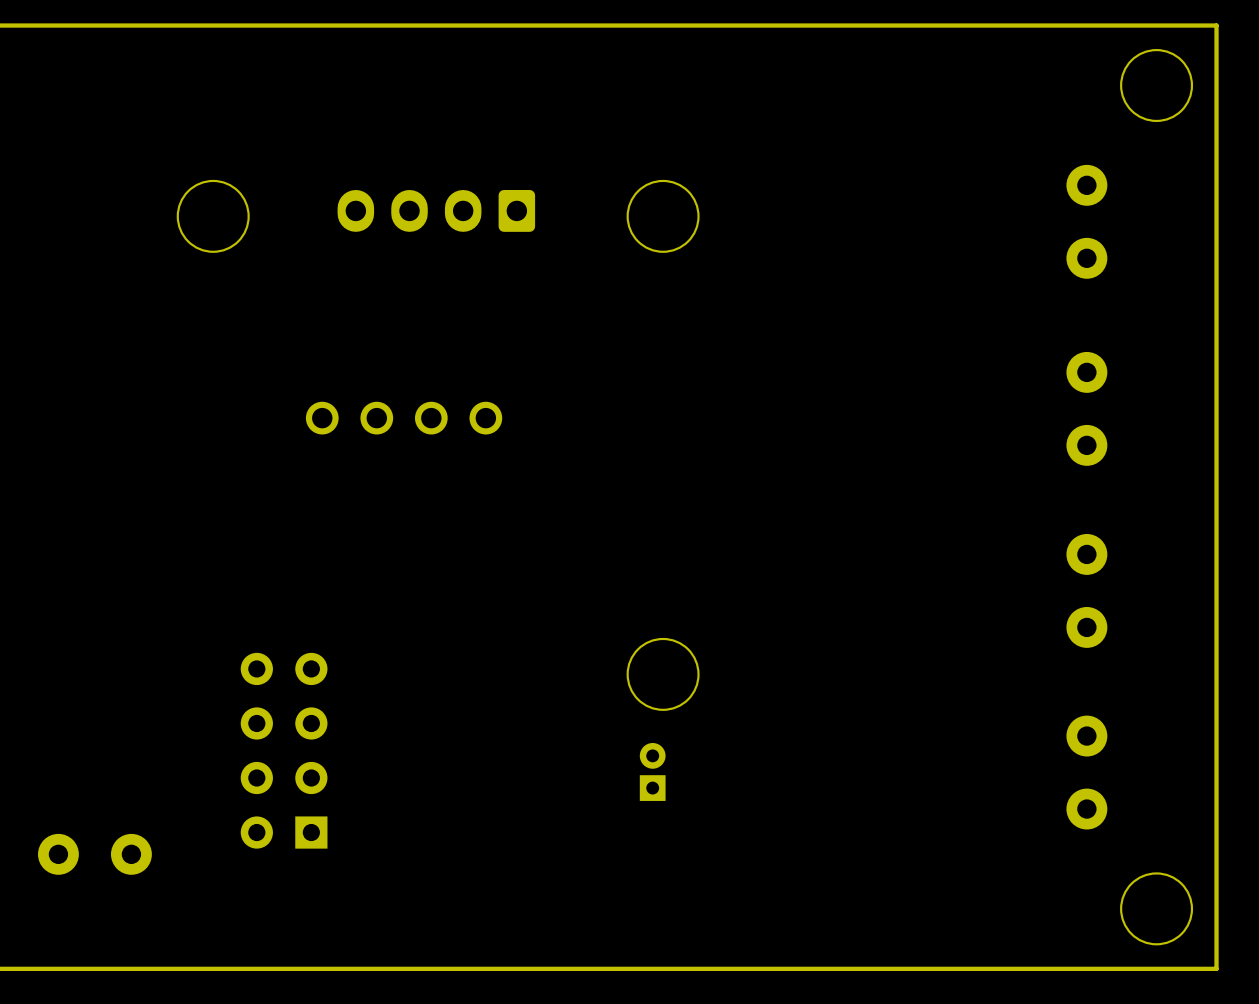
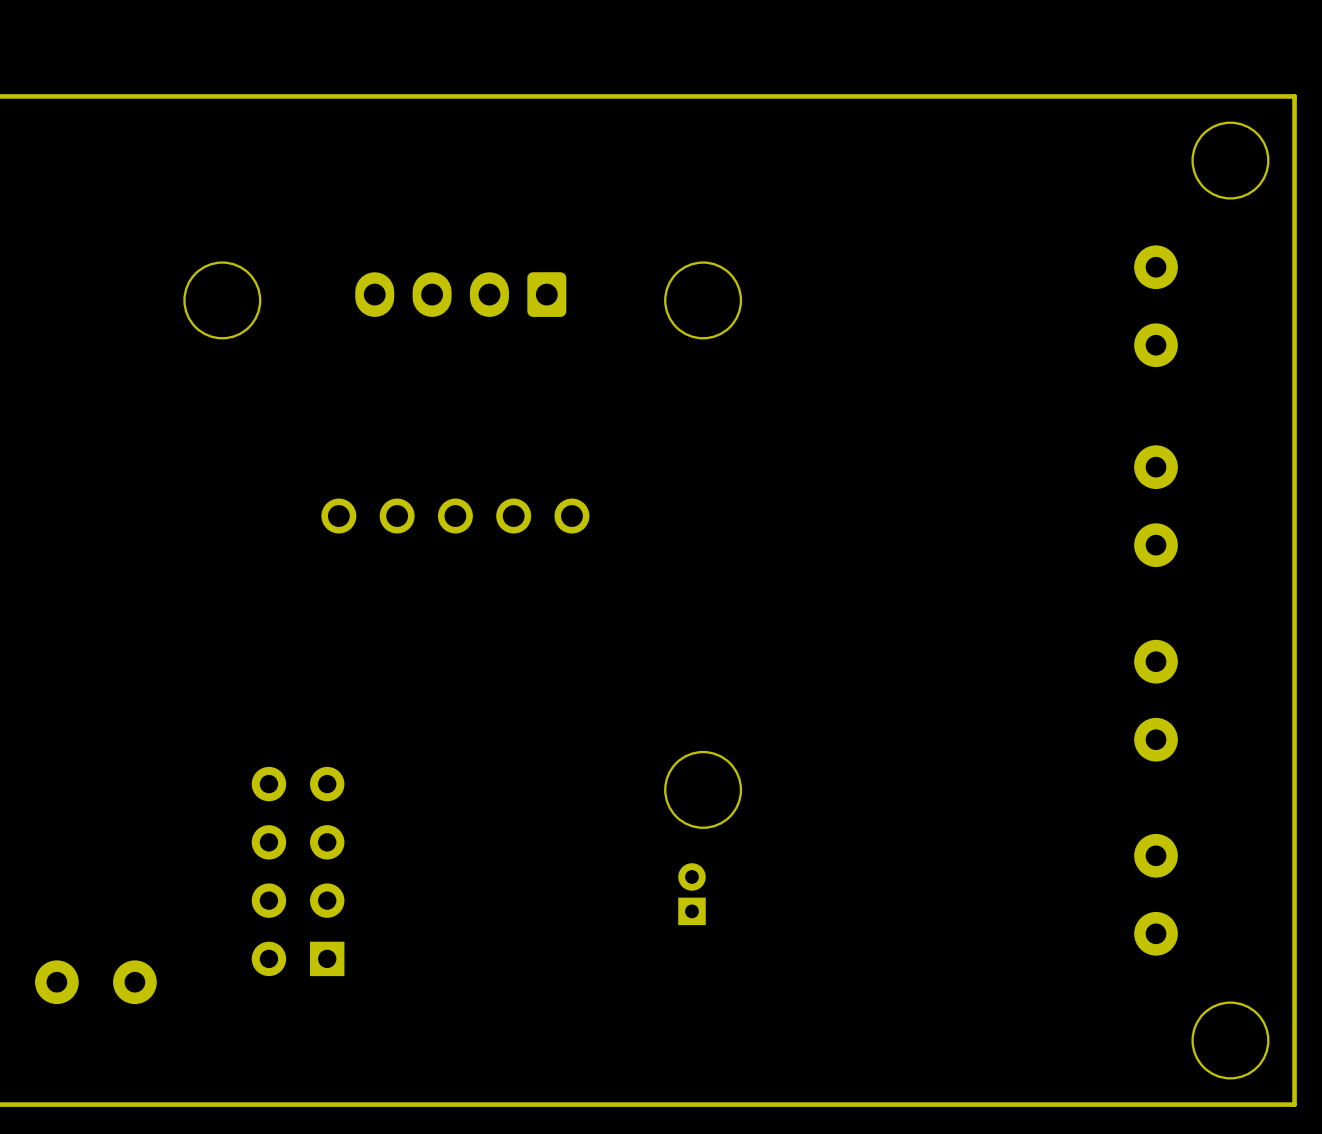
part: none -> (455, 516)

